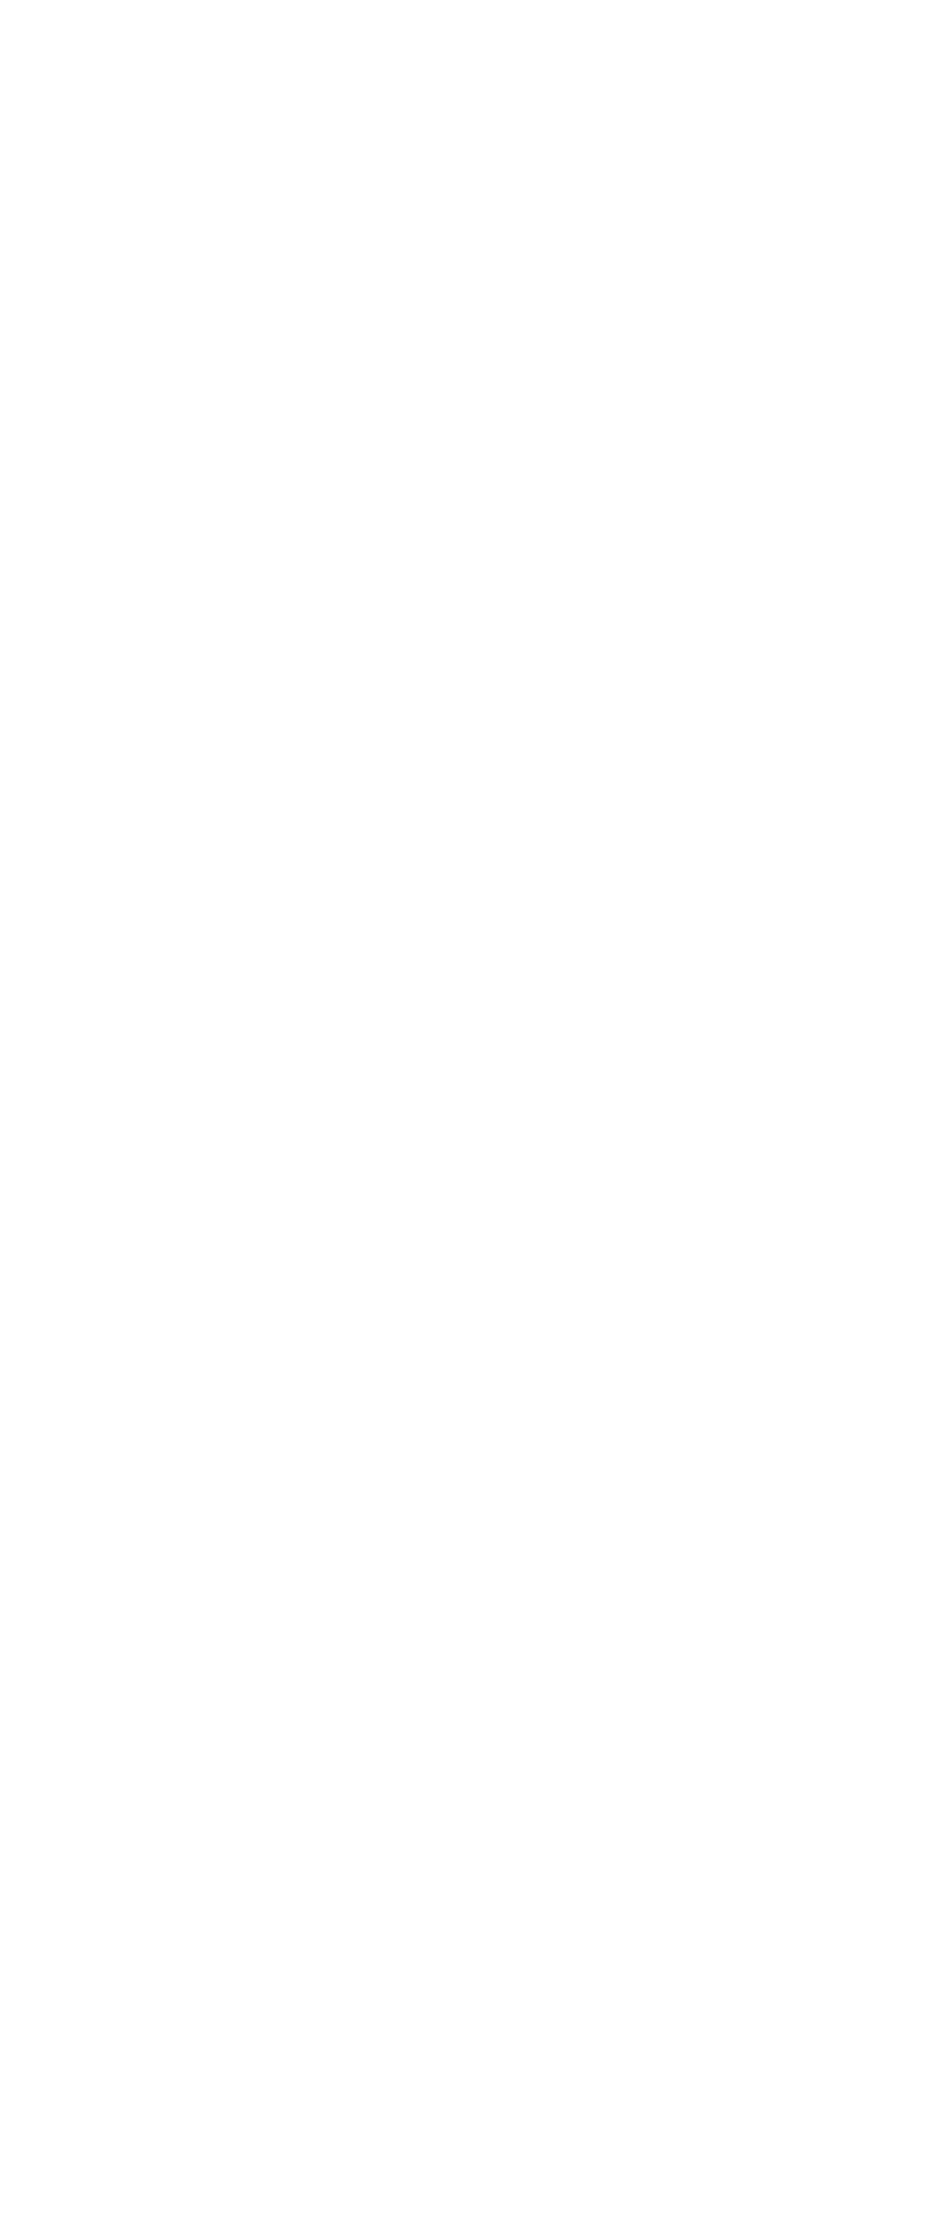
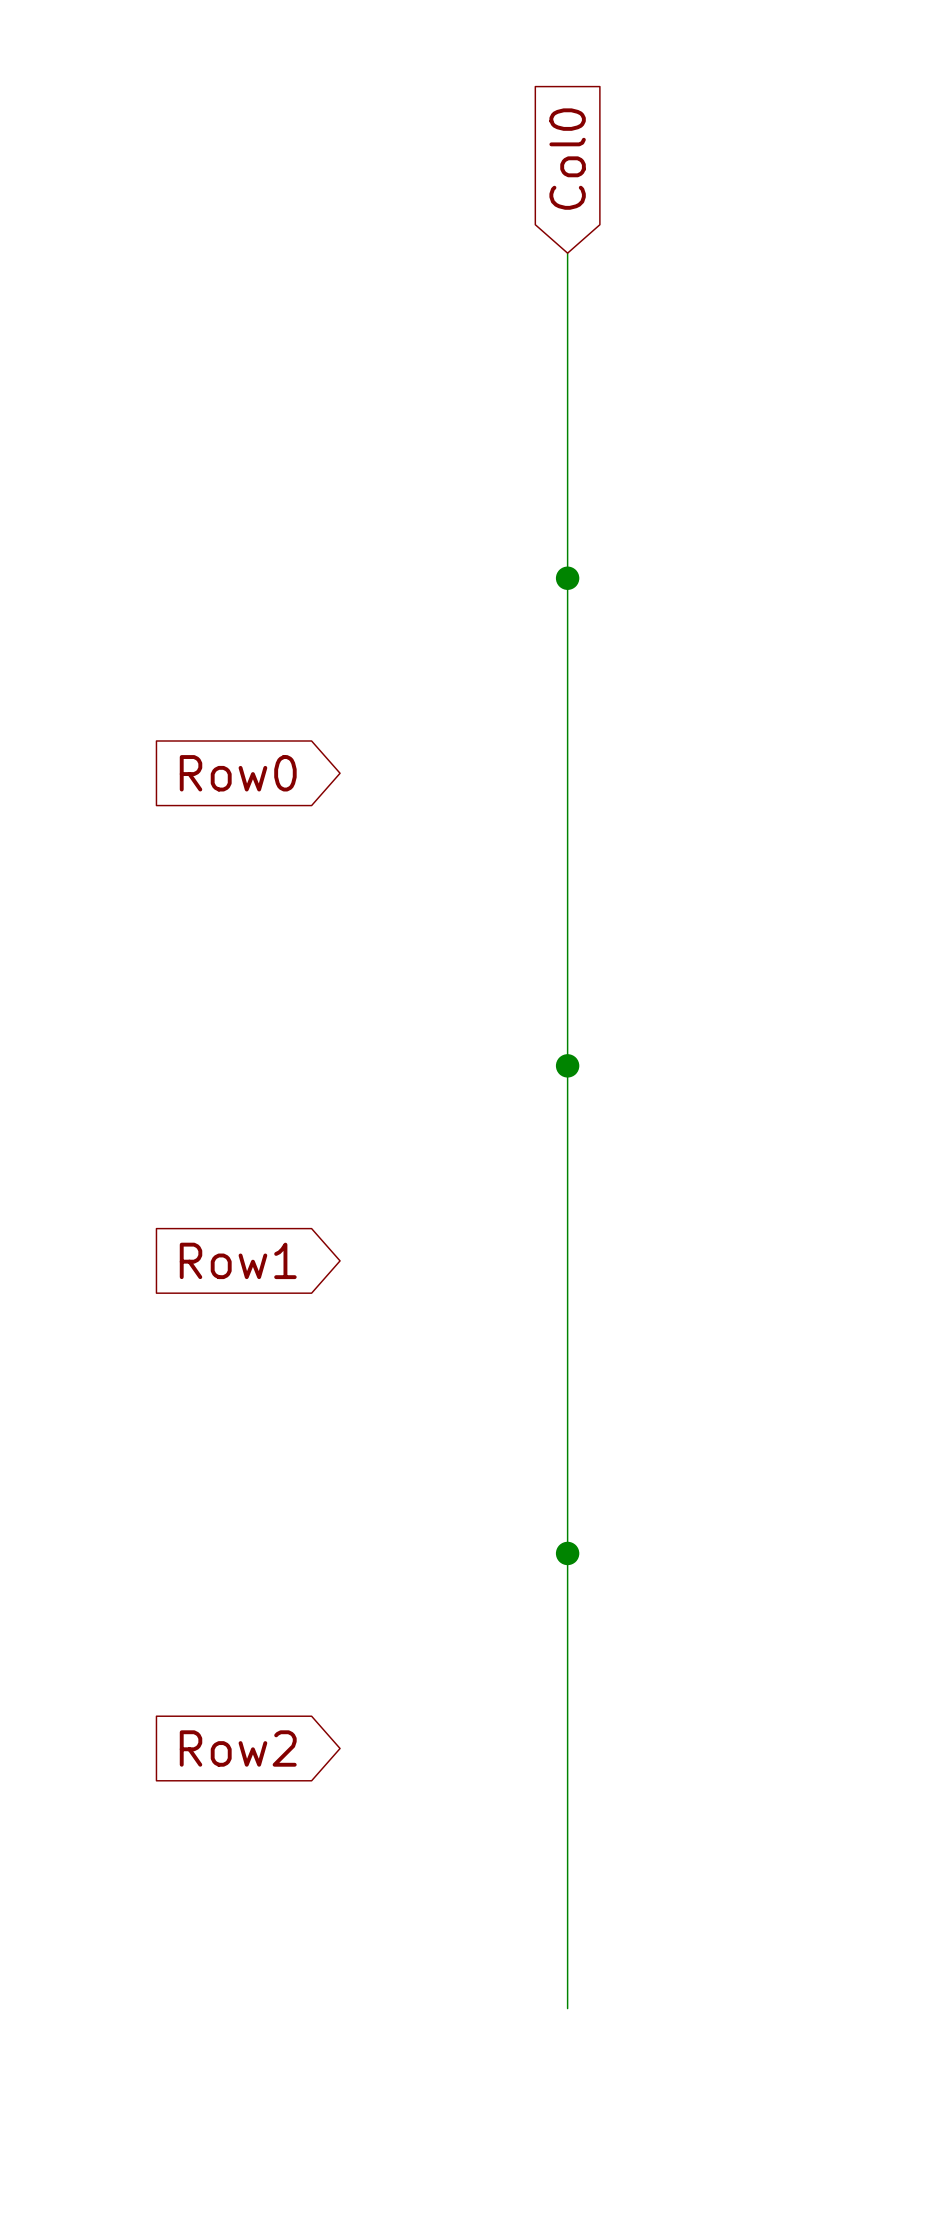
global label: none -> Col0 (567, 159)
wire: none -> (567, 253) (567, 2008)
junction: none -> (567, 578)
global label: none -> Row0 (238, 773)
junction: none -> (567, 1065)
global label: none -> Row1 (238, 1260)
junction: none -> (567, 1553)
global label: none -> Row2 (238, 1748)

